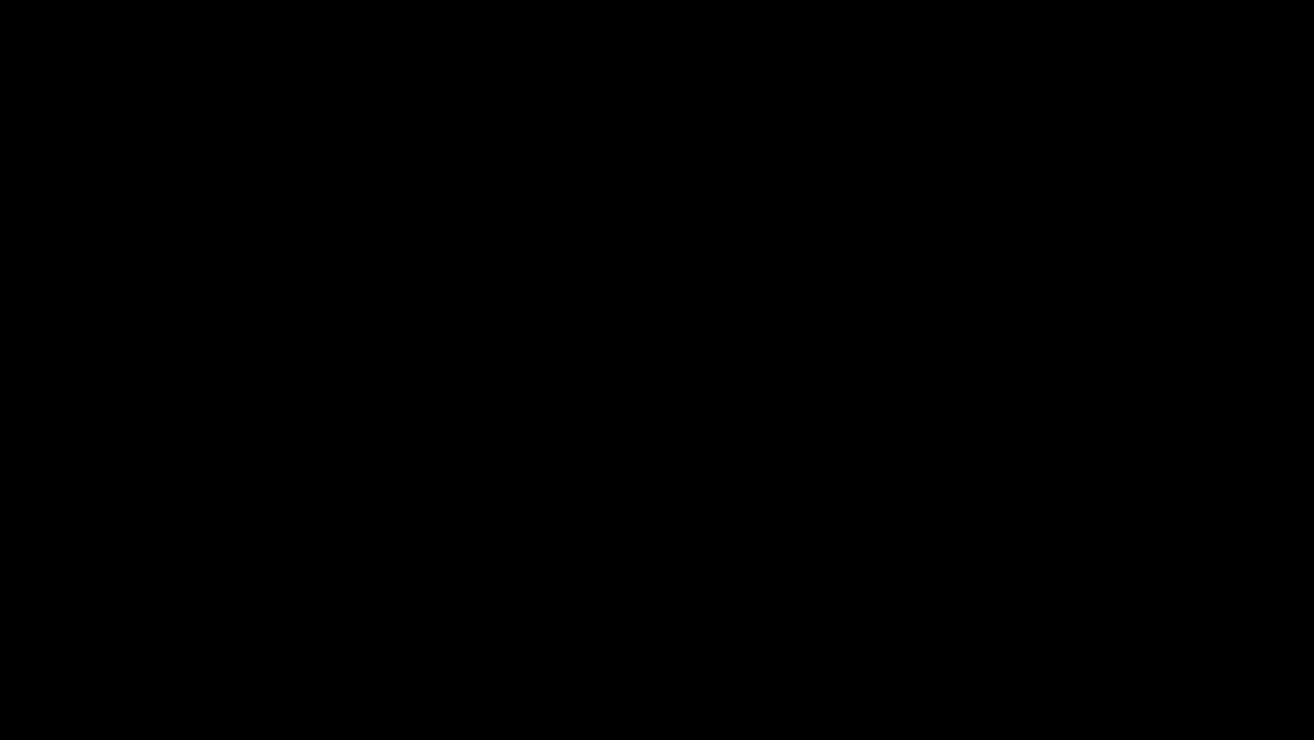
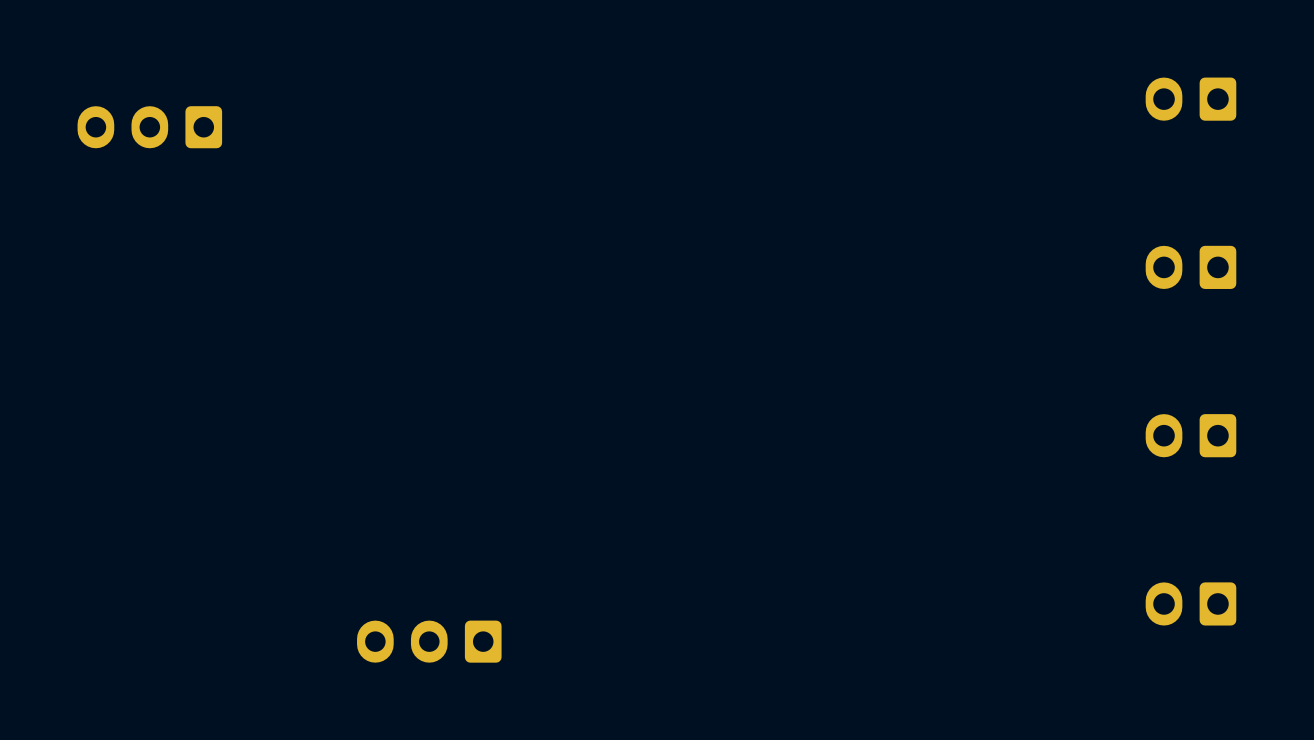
part: none -> (1190, 99)
part: none -> (149, 127)
part: none -> (1190, 267)
part: none -> (1190, 435)
part: none -> (1190, 603)
part: none -> (429, 641)

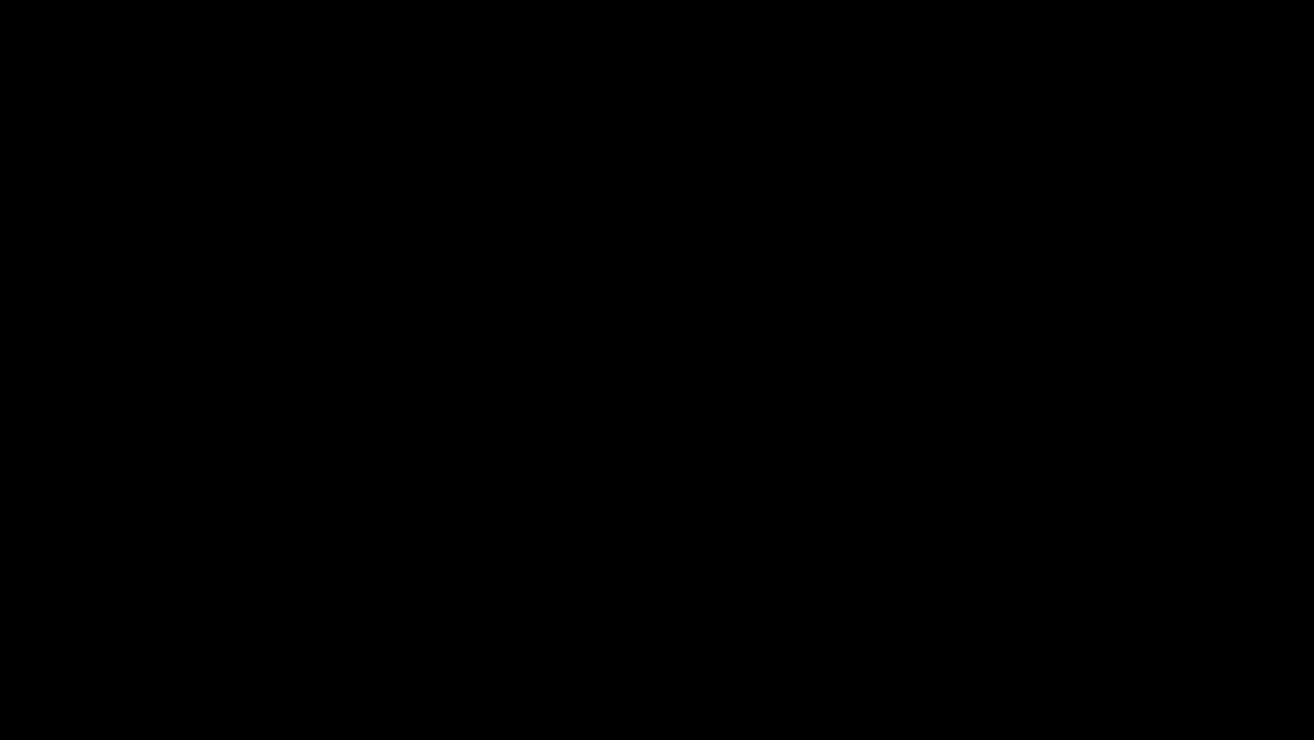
part: (1190, 99) -> none
part: (149, 127) -> none
part: (1190, 267) -> none
part: (1190, 435) -> none
part: (1190, 603) -> none
part: (429, 641) -> none

